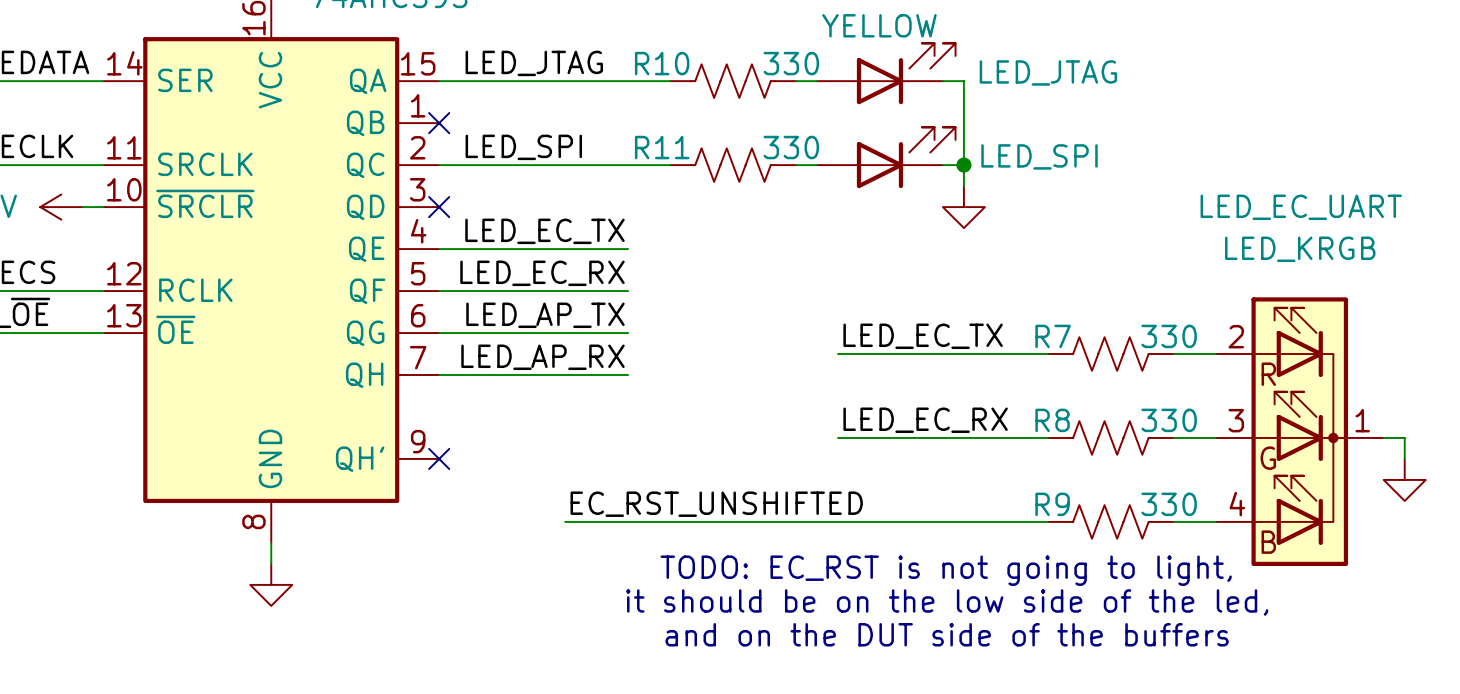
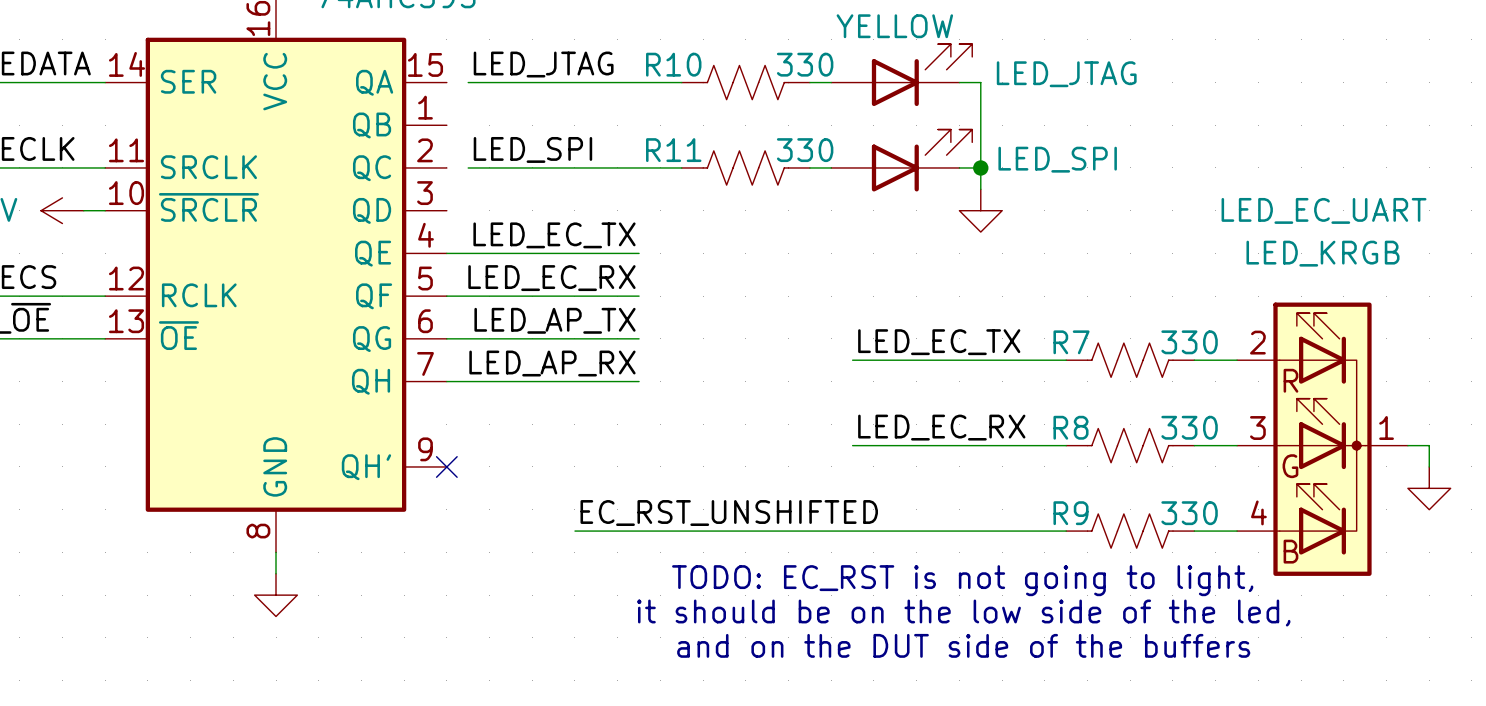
wire: (439, 81) (460, 81) -> none
no-connect mark: (439, 123) -> none
wire: (439, 165) (460, 165) -> none
no-connect mark: (439, 207) -> none

